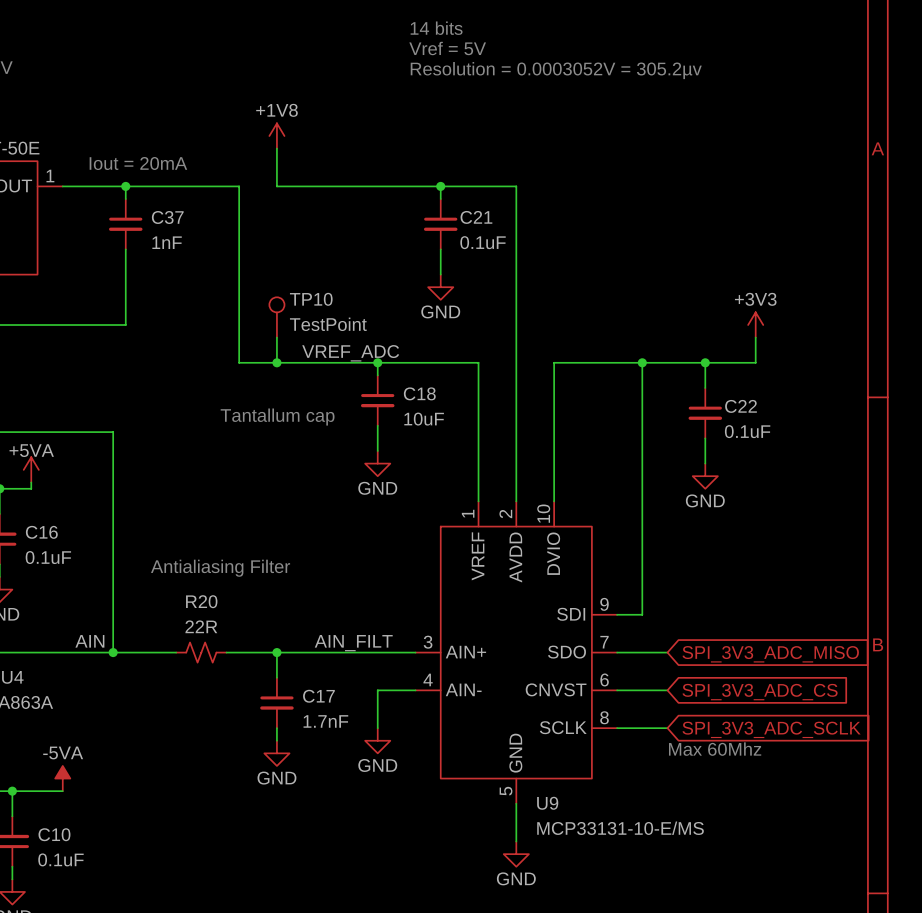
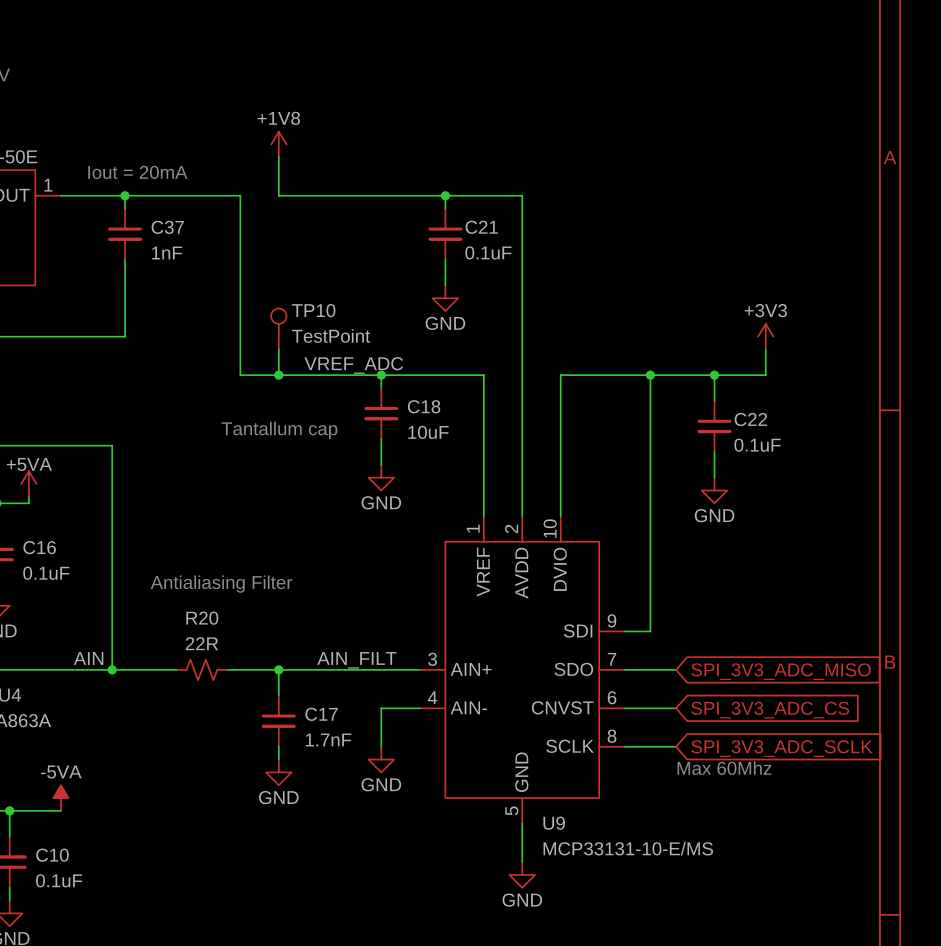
text: 14 bits (436, 28) -> none
text: Vref = 5V (447, 48) -> none
text: Resolution = 0.0003052V = 305.2µv (556, 70) -> none

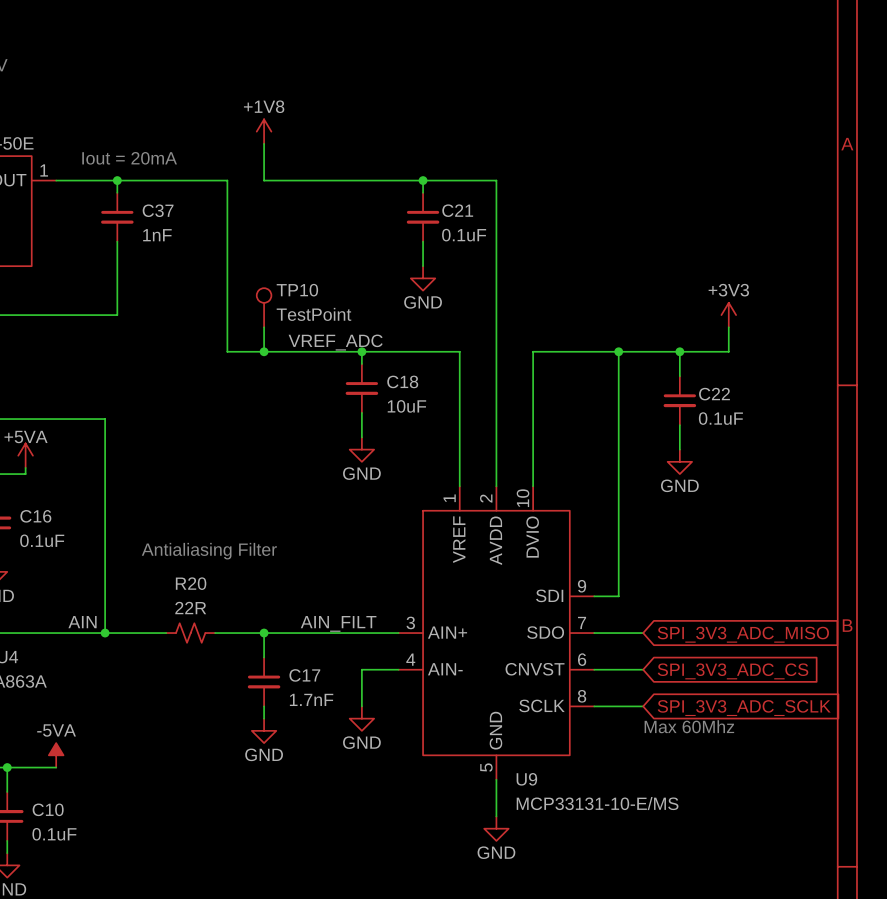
text: Tantallum cap (279, 430) -> none

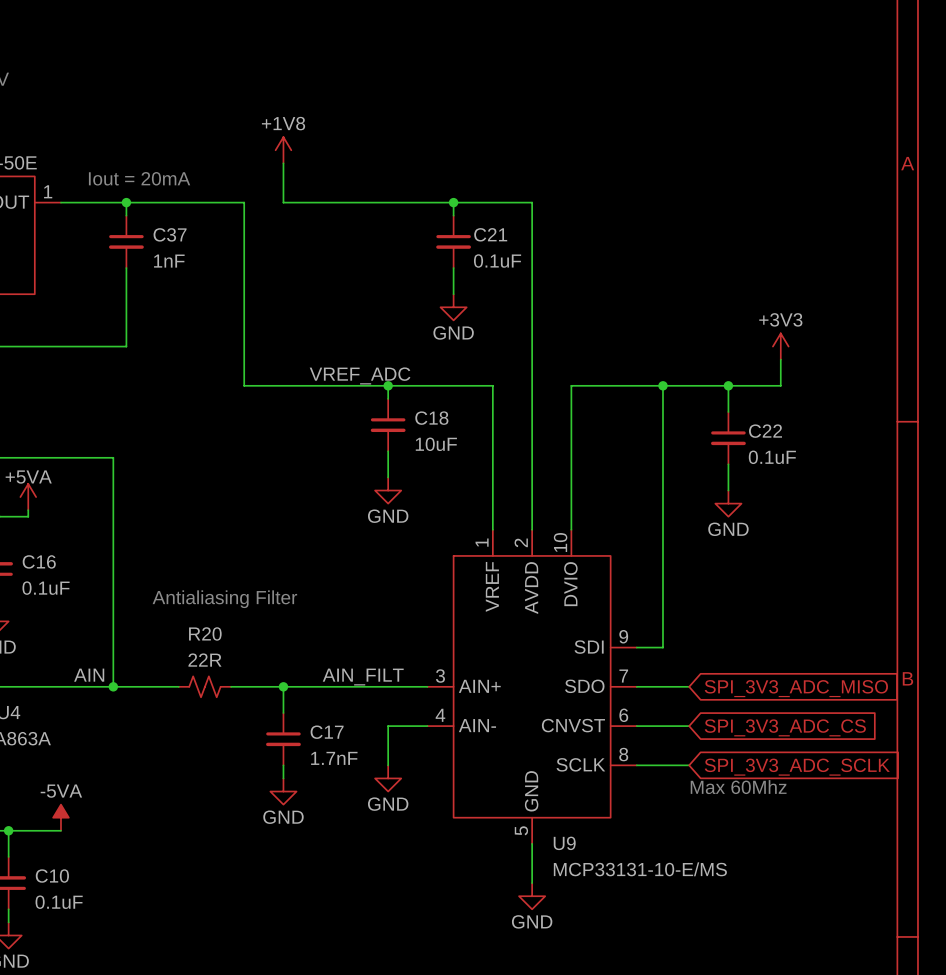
TP10: TestPoint (264, 307) -> none
wire: (264, 327) (264, 351) -> none
junction: (264, 351) -> none

